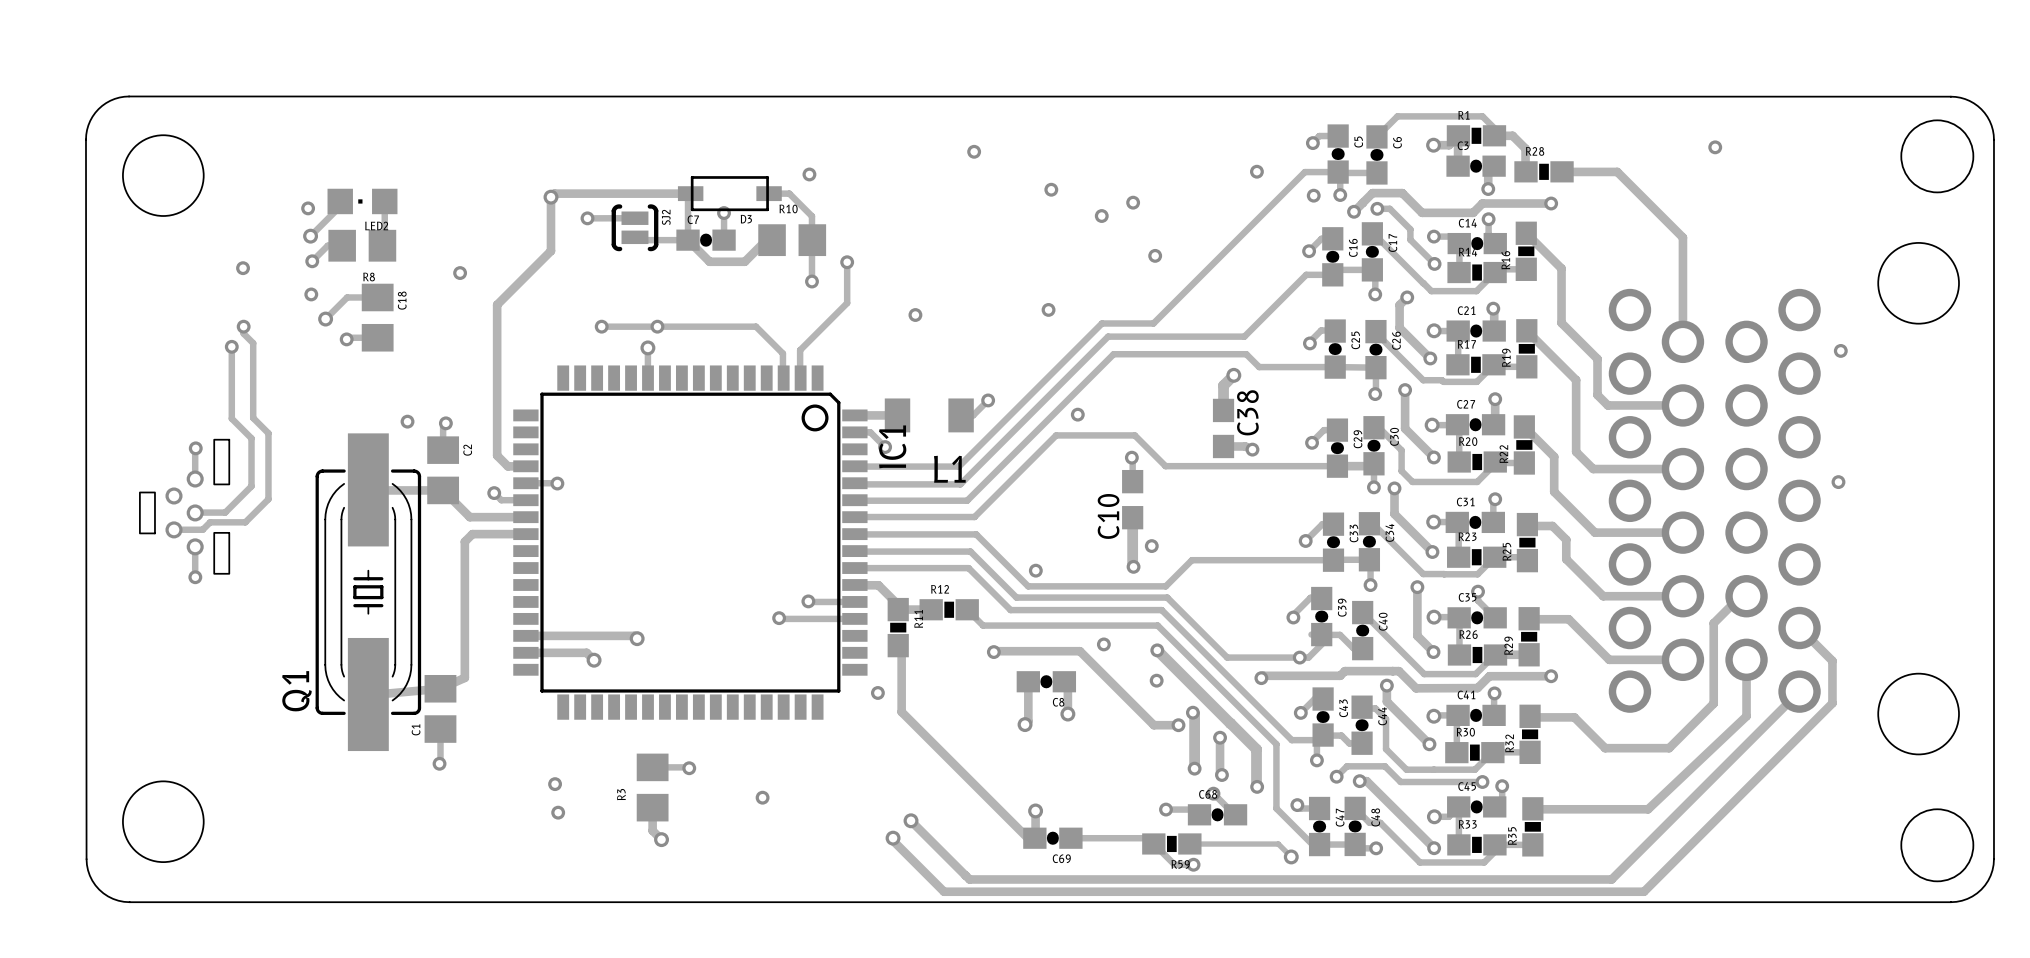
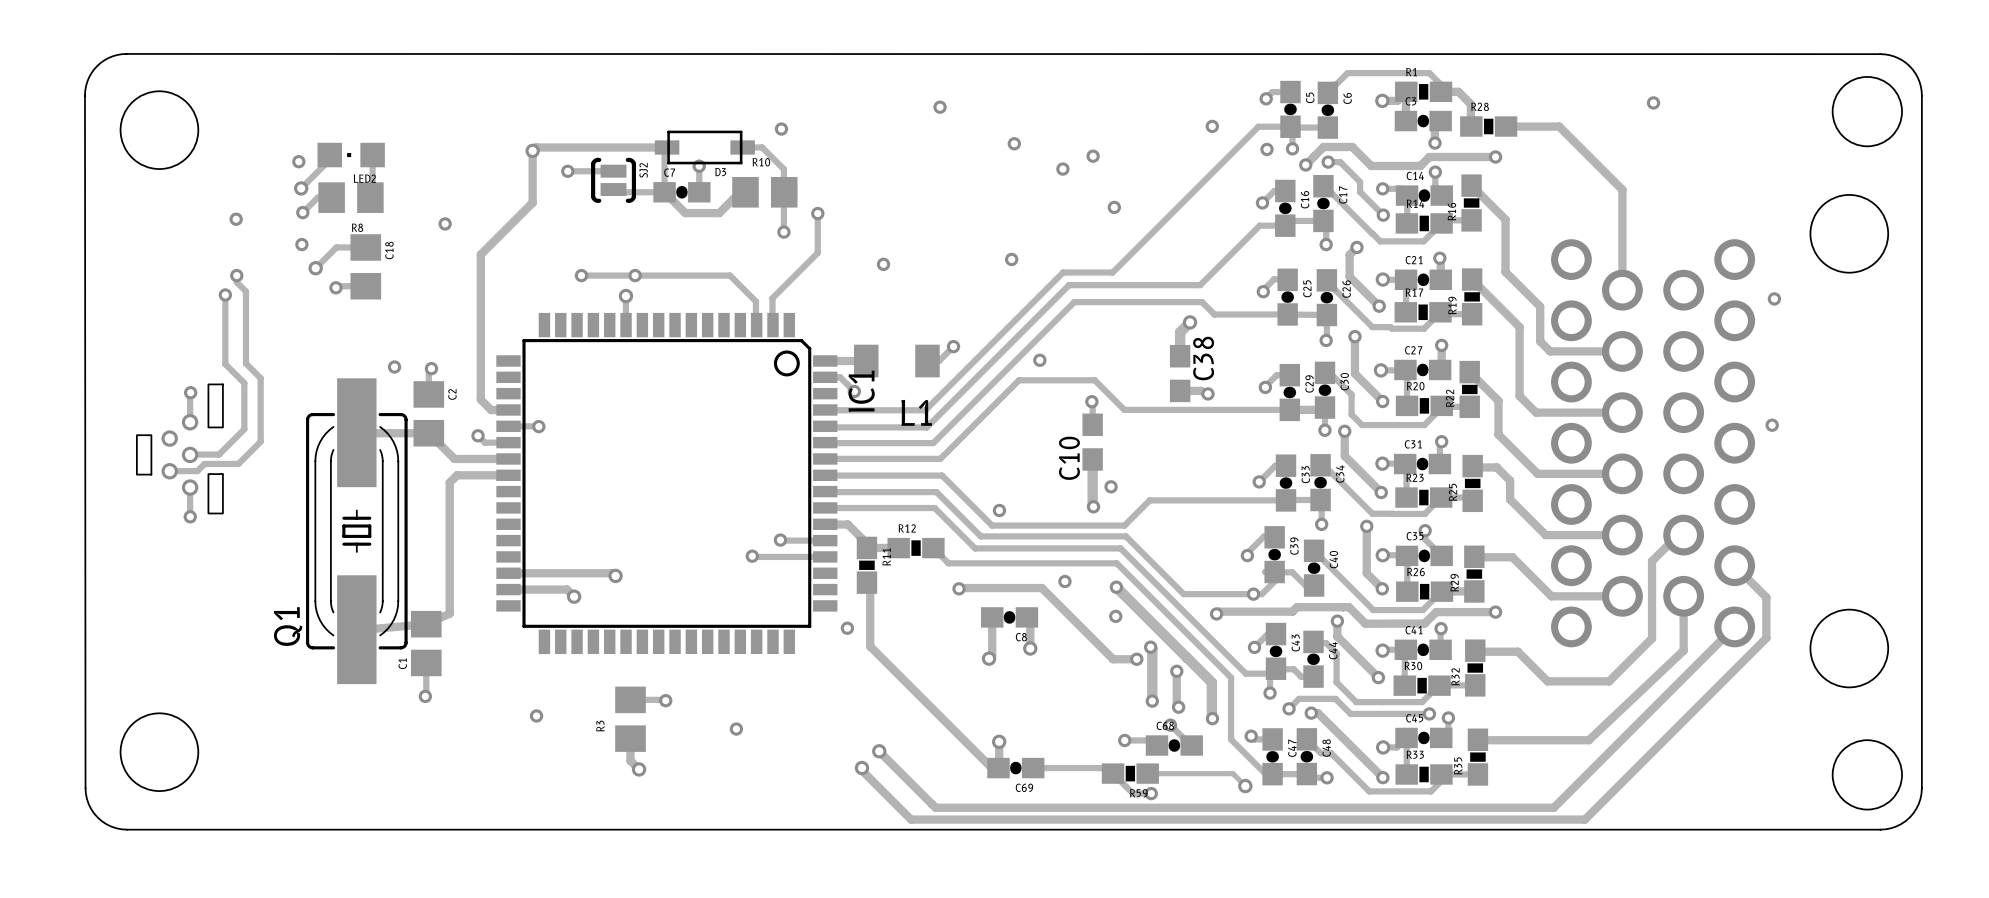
via: (558, 812) -> none

